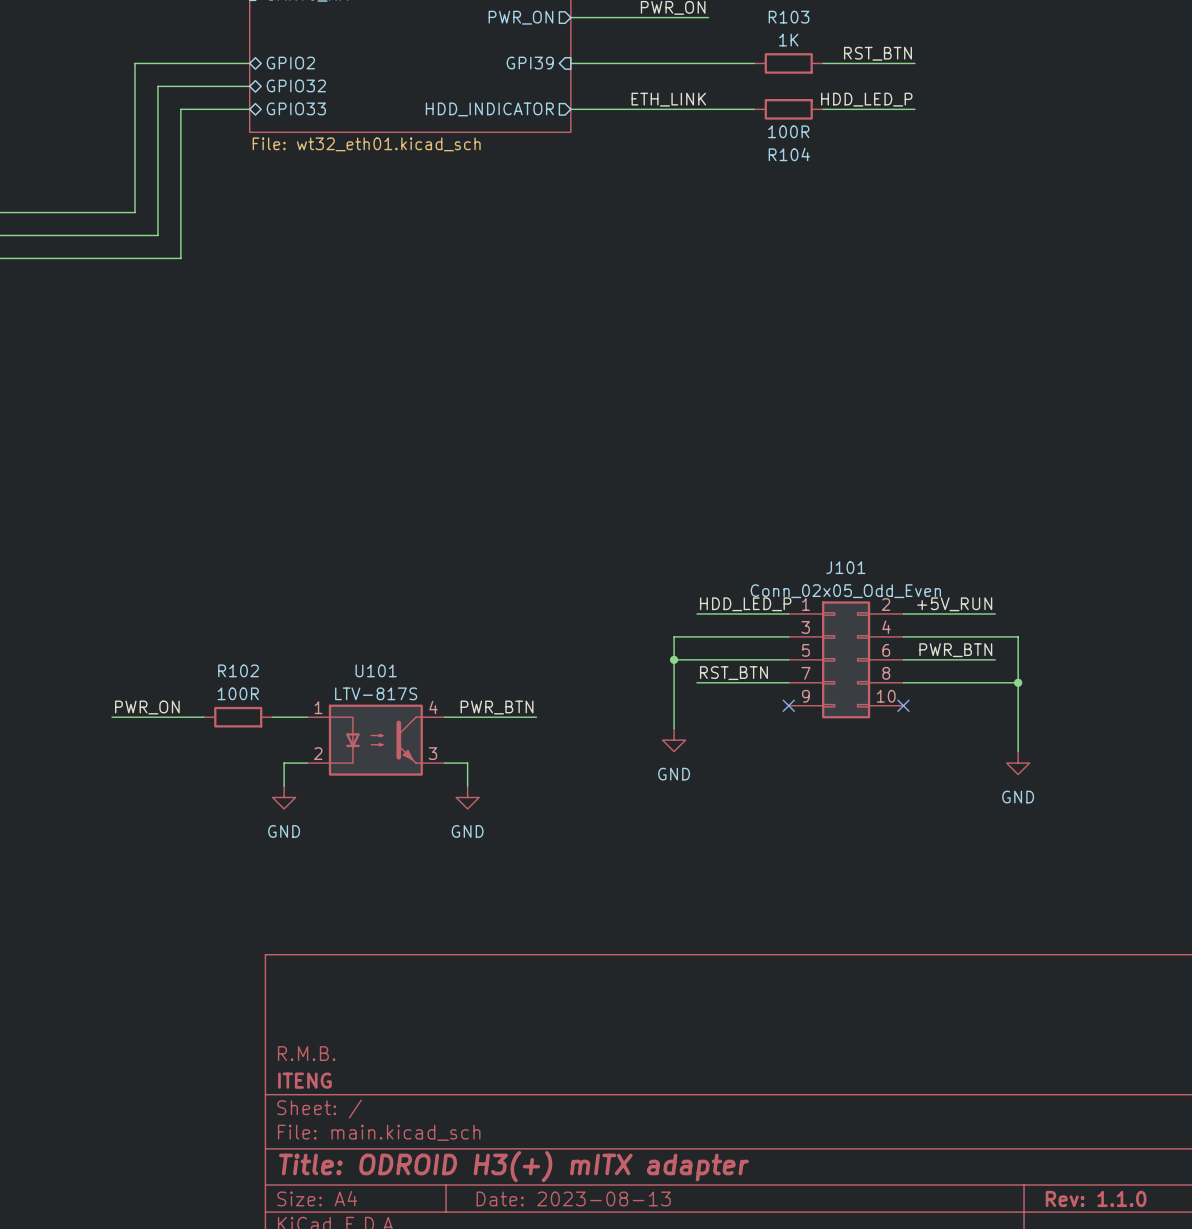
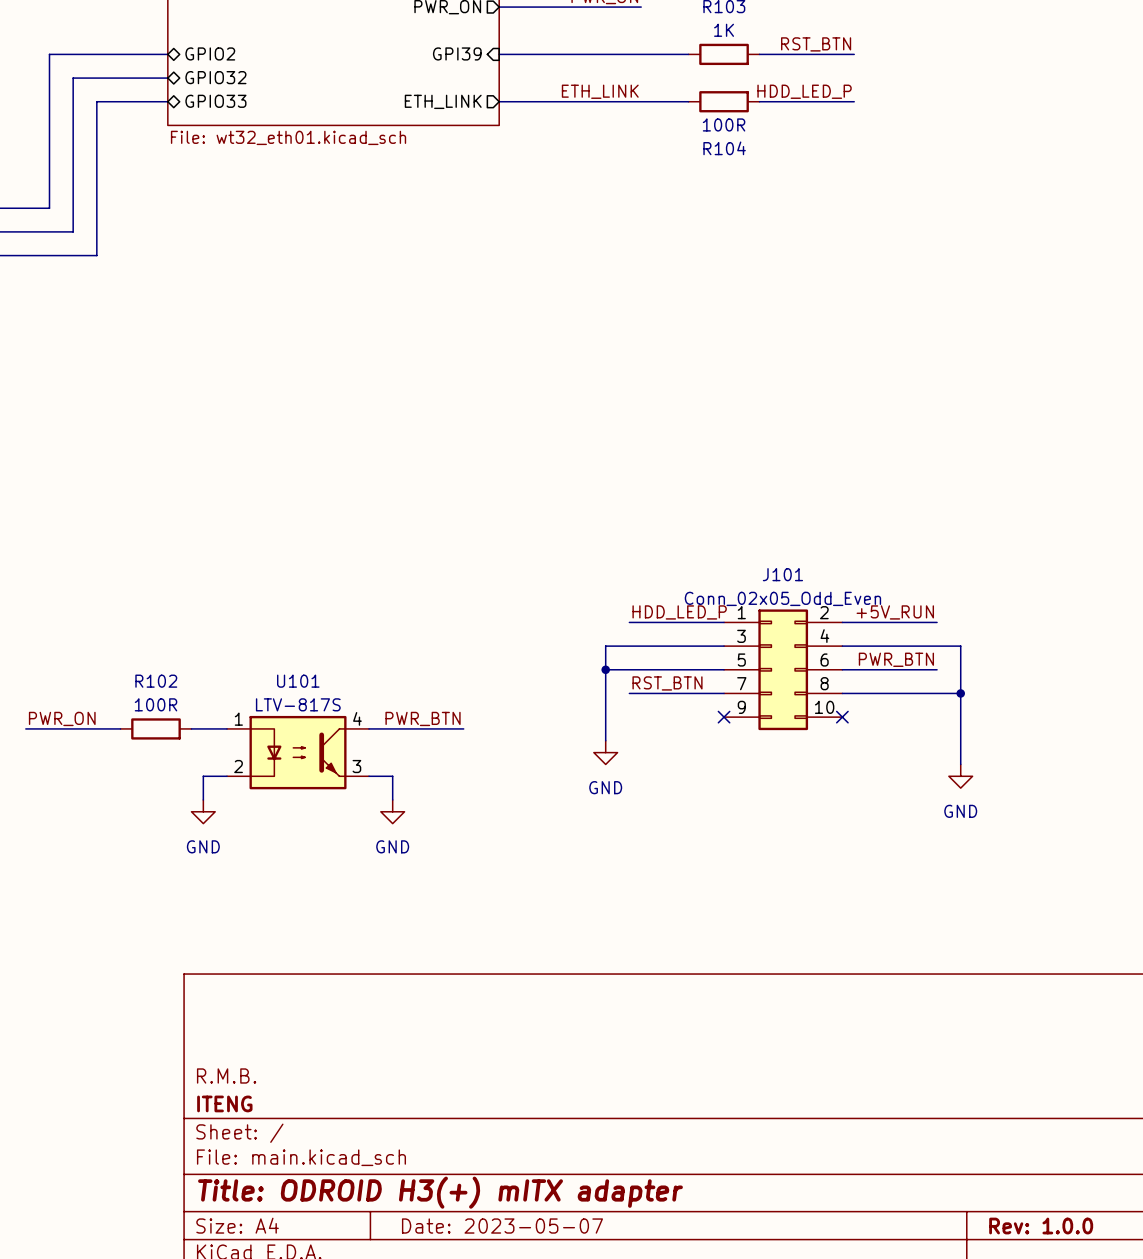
sheet pin: HDD_INDICATOR (489, 109) -> ETH_LINK (443, 101)
title block: Date: 2023-08-13 (573, 1198) -> Date: 2023-05-07 (502, 1226)
title block: Rev: 1.1.0 (1096, 1198) -> Rev: 1.0.0 (1041, 1226)

